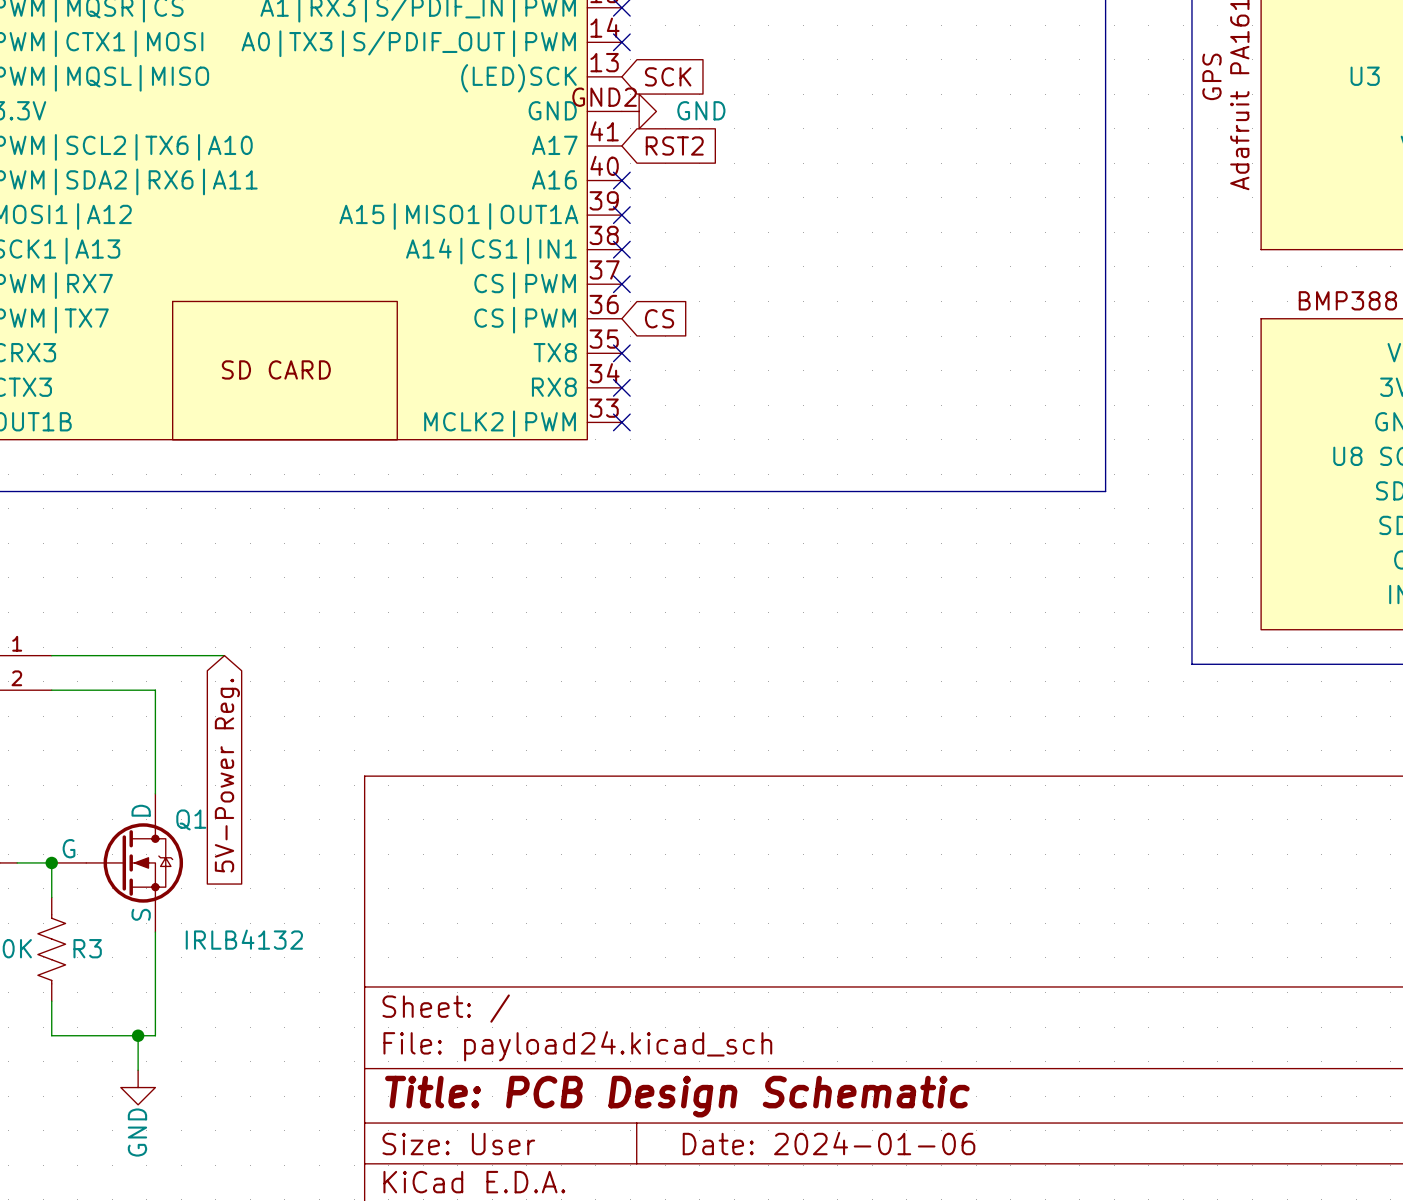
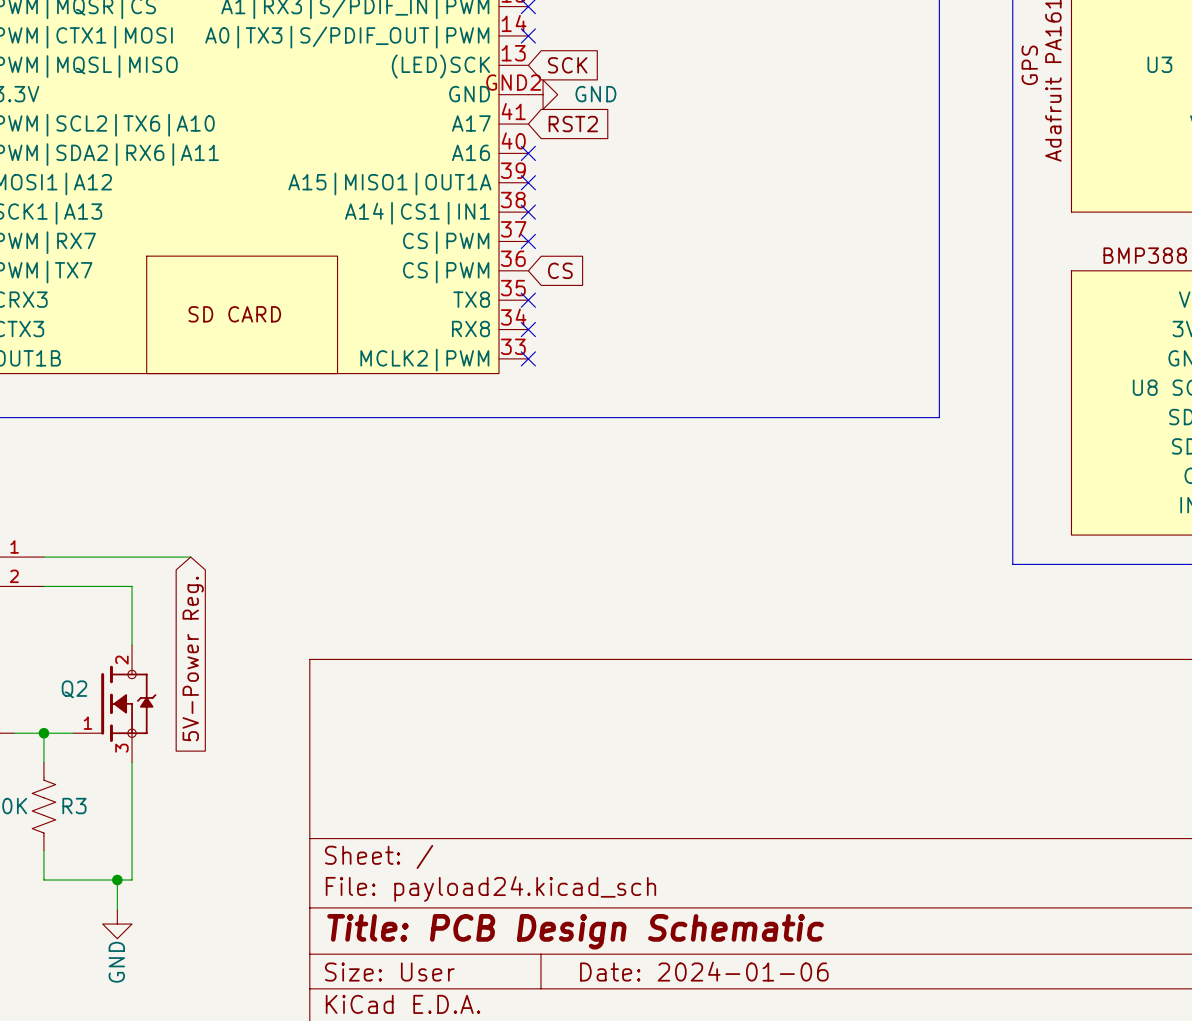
Q2: none -> (114, 703)
Q1: IRLB4132 (117, 862) -> none

